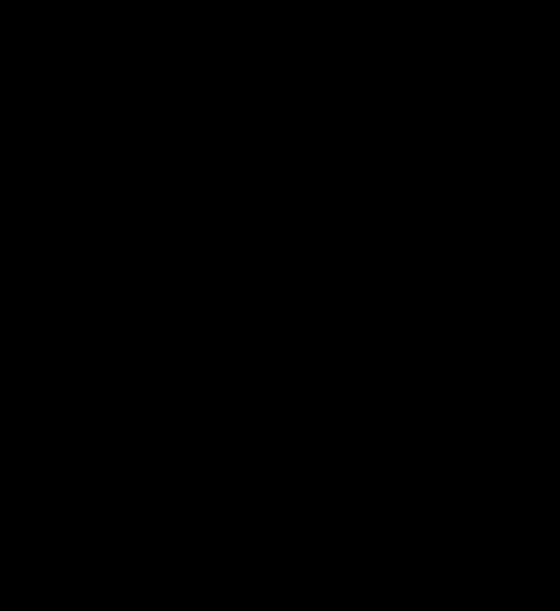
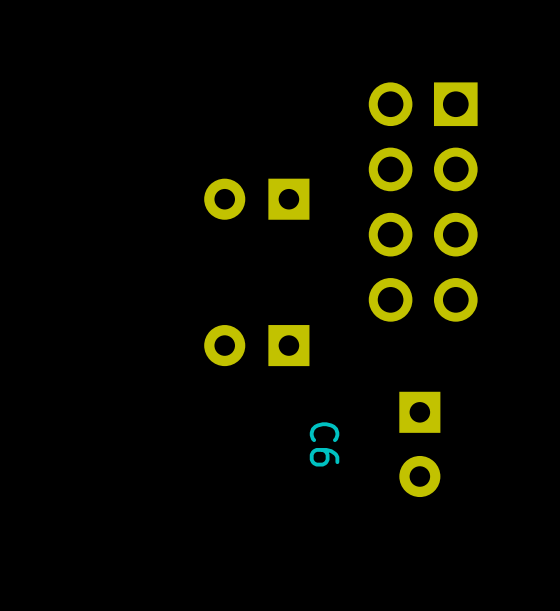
part: none -> (256, 199)
part: none -> (423, 202)
part: none -> (256, 345)
C6: none -> (419, 444)

